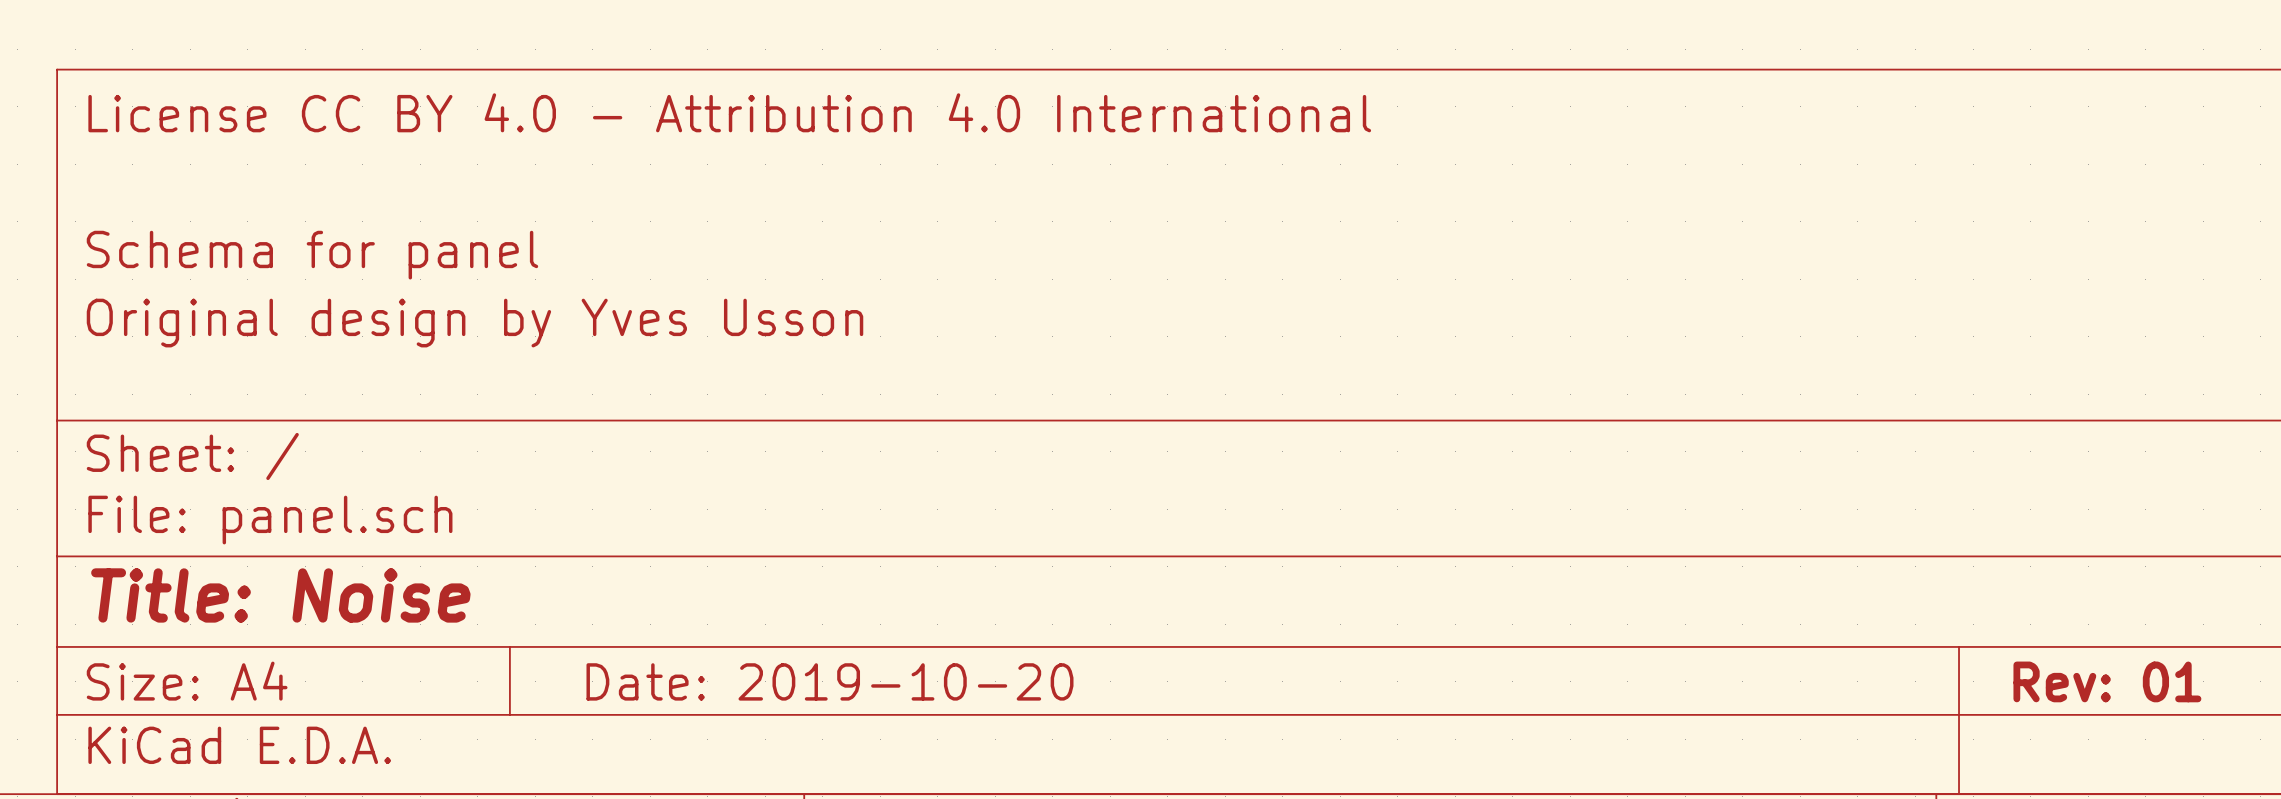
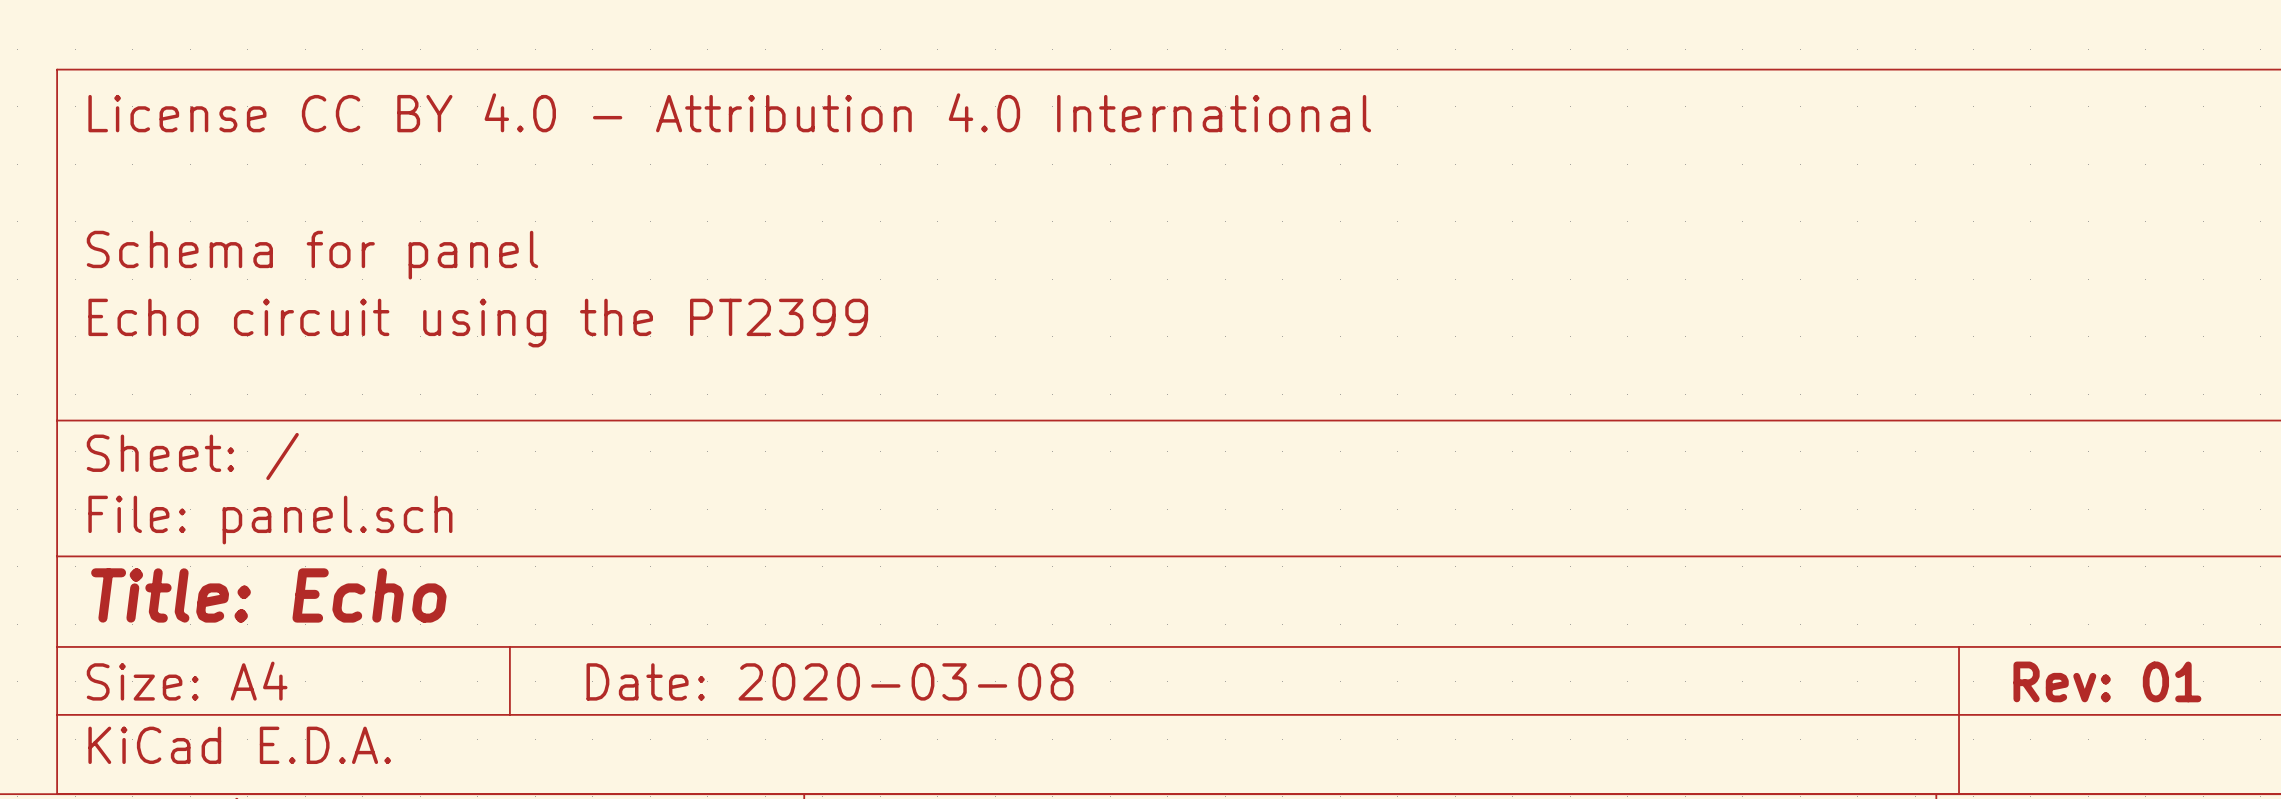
title block: Original design by Yves Usson (475, 323) -> Echo circuit using the PT2399 (478, 323)
title block: Title: Noise (280, 595) -> Title: Echo (268, 595)
title block: Date: 2019-10-20 (829, 681) -> Date: 2020-03-08 (829, 681)

